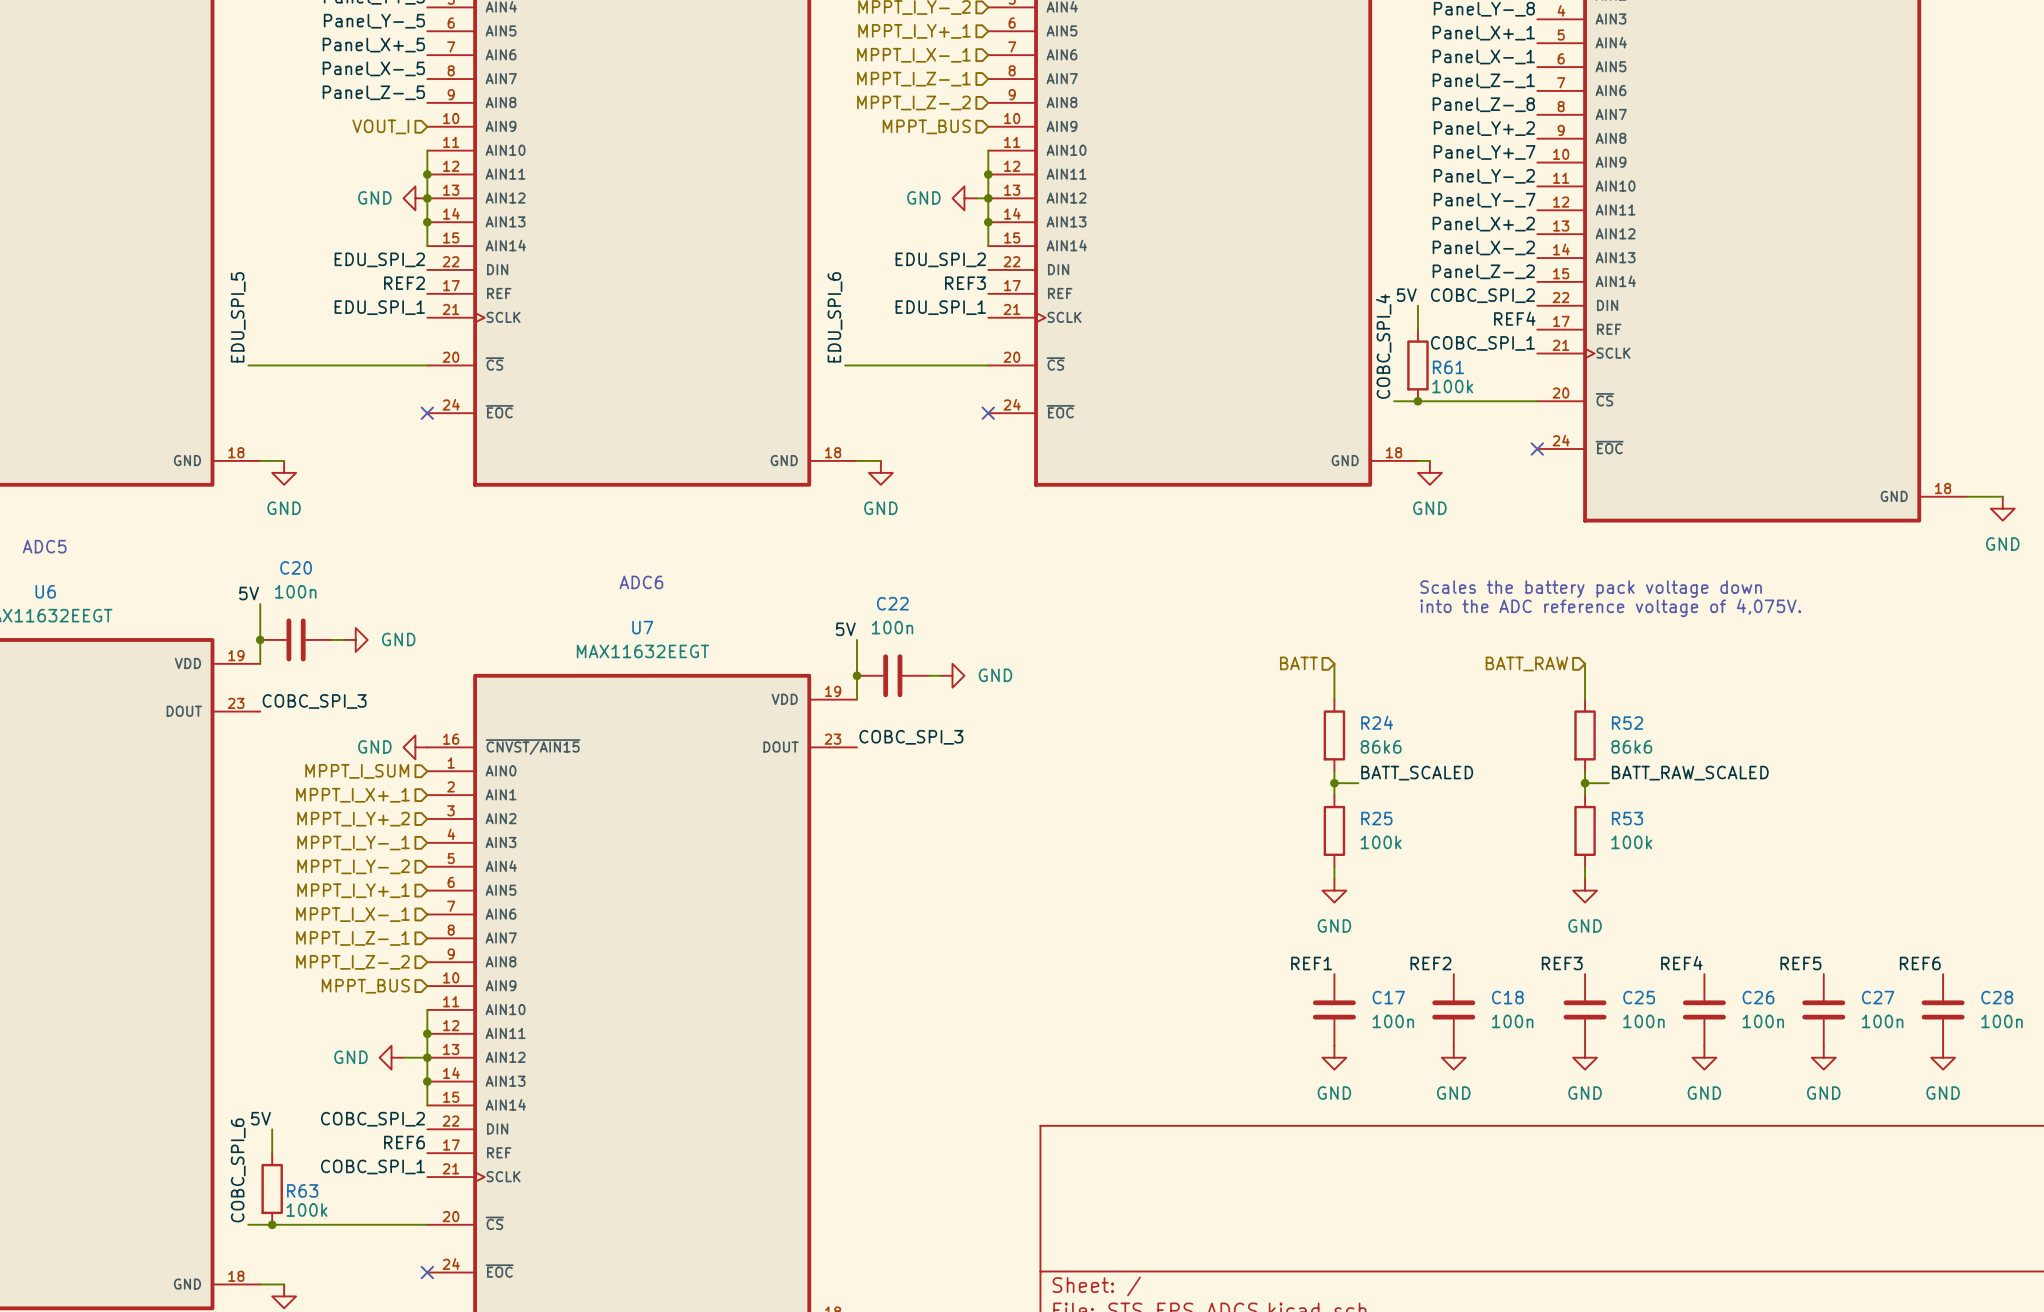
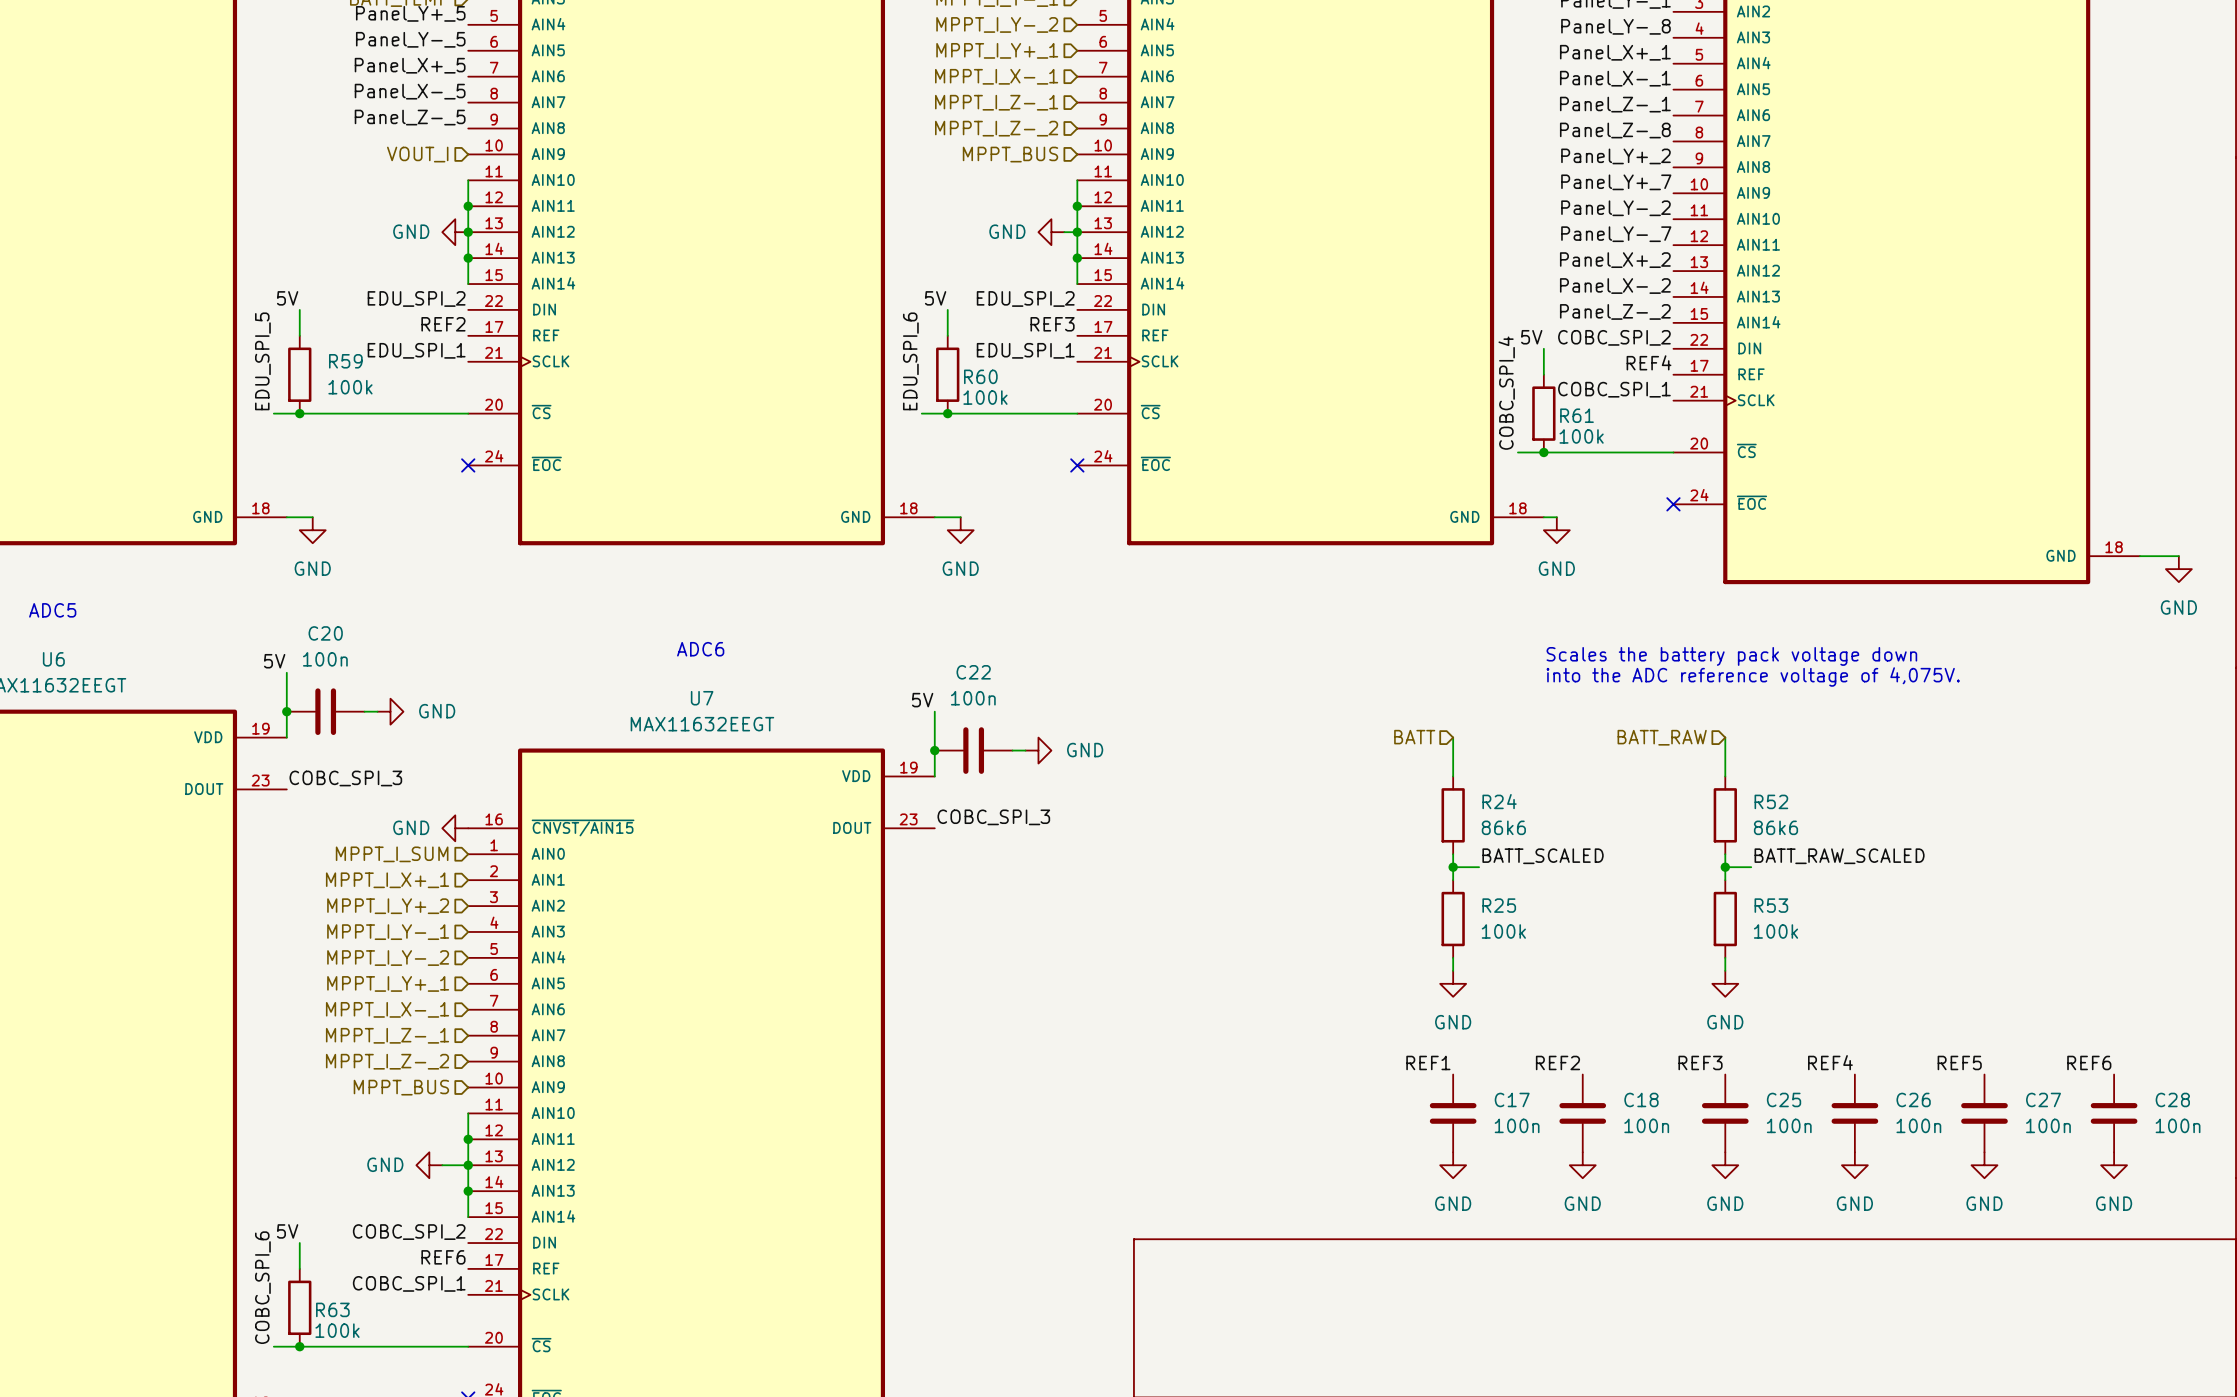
label: none -> 5V (287, 298)
label: none -> 5V (935, 298)
wire: none -> (299, 309) (299, 335)
wire: none -> (947, 309) (947, 335)
R59: none -> 100k (299, 374)
R60: none -> 100k (947, 374)
junction: none -> (299, 413)
junction: none -> (947, 413)

